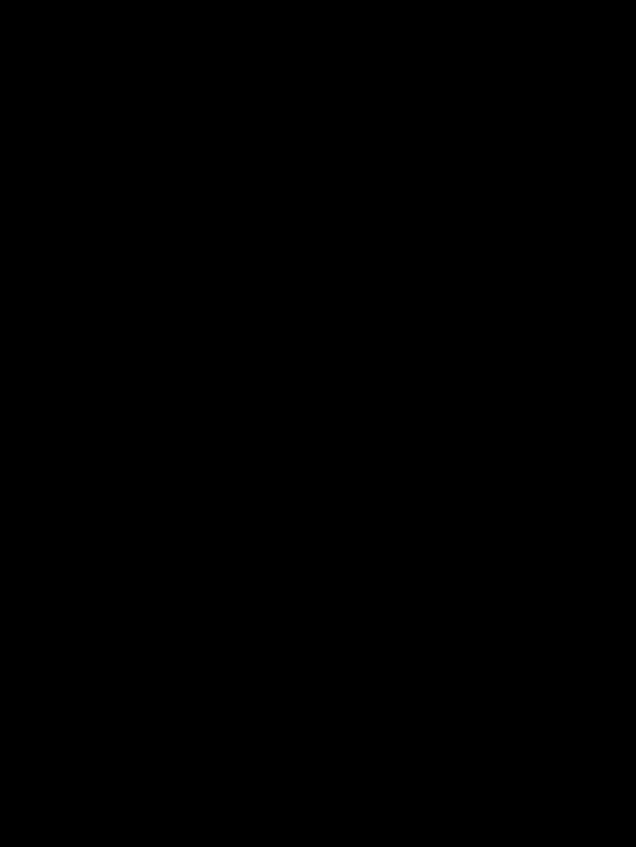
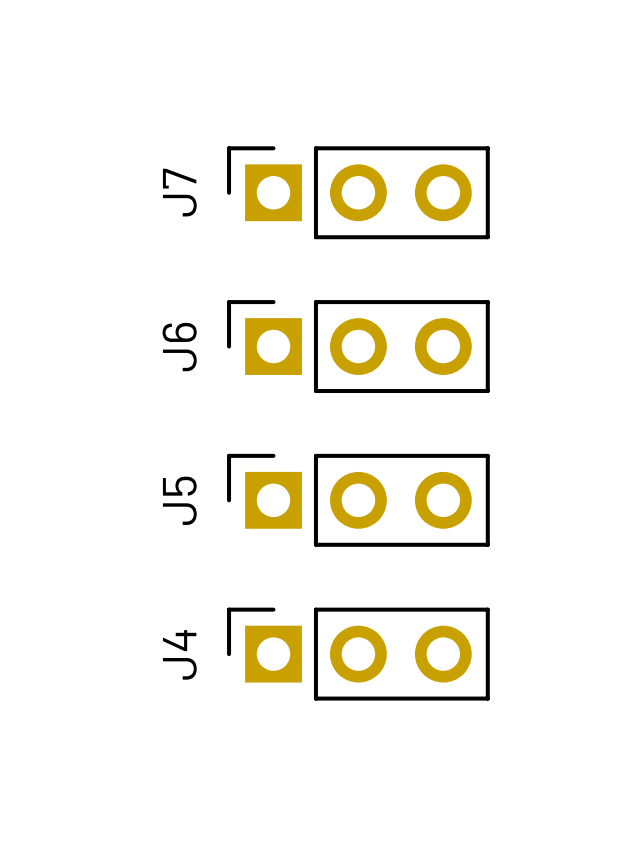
J7: none -> (358, 192)
J6: none -> (358, 346)
J5: none -> (358, 500)
J4: none -> (358, 654)

